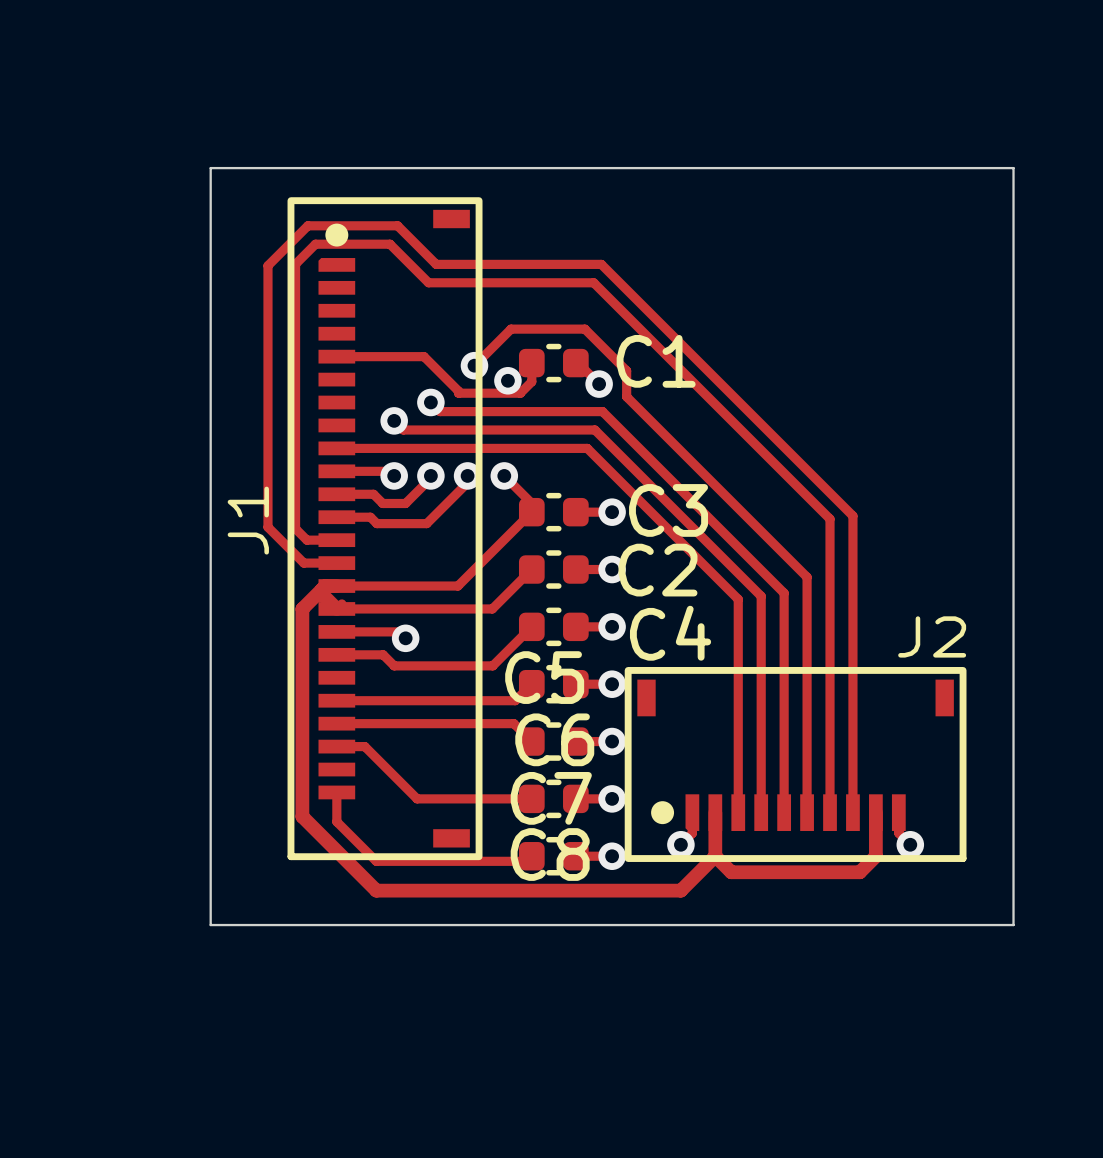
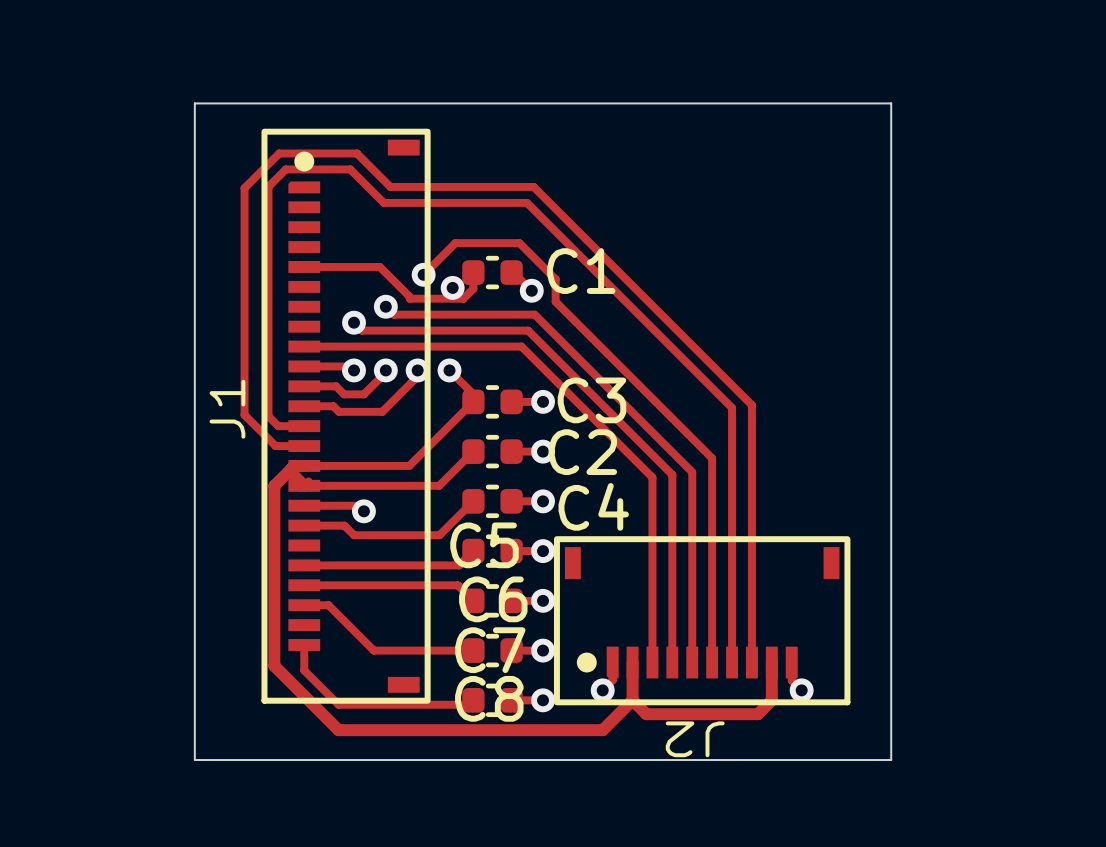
J2 name rotation: 0° (932, 636) -> 180° (695, 739)
J2 name position: J2 (932, 636) -> J2 (695, 739)

